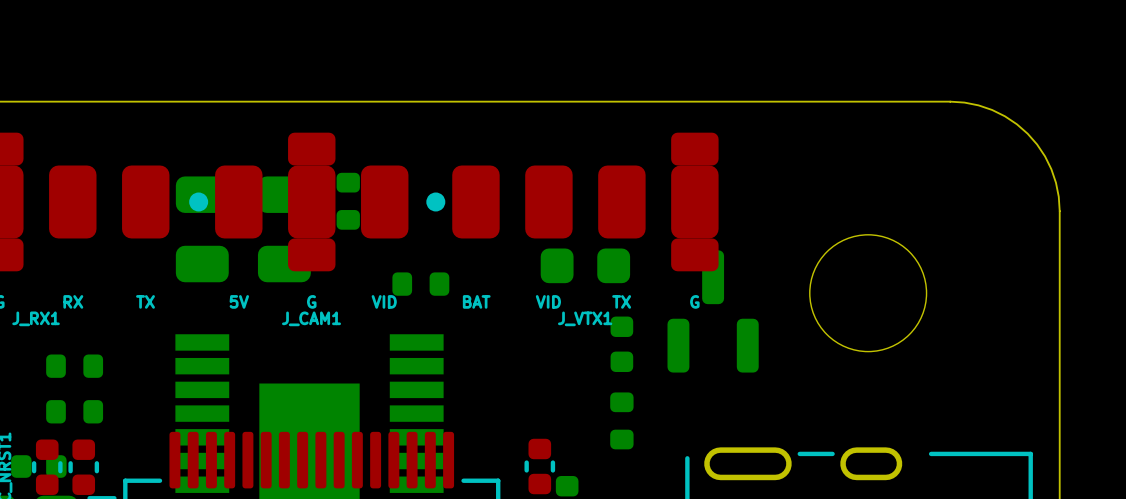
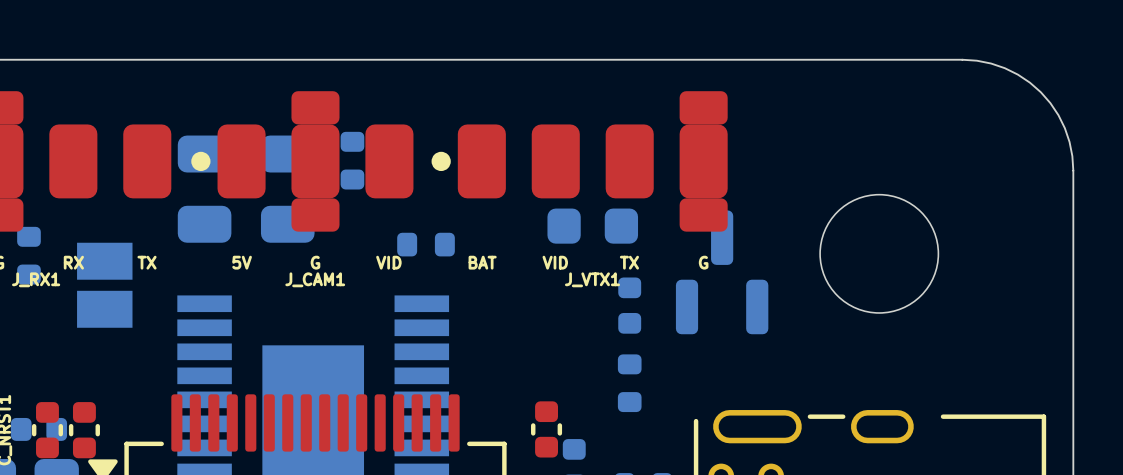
part: none -> (28, 255)
part: none -> (104, 285)
part: (74, 366) -> none
part: (74, 411) -> none

